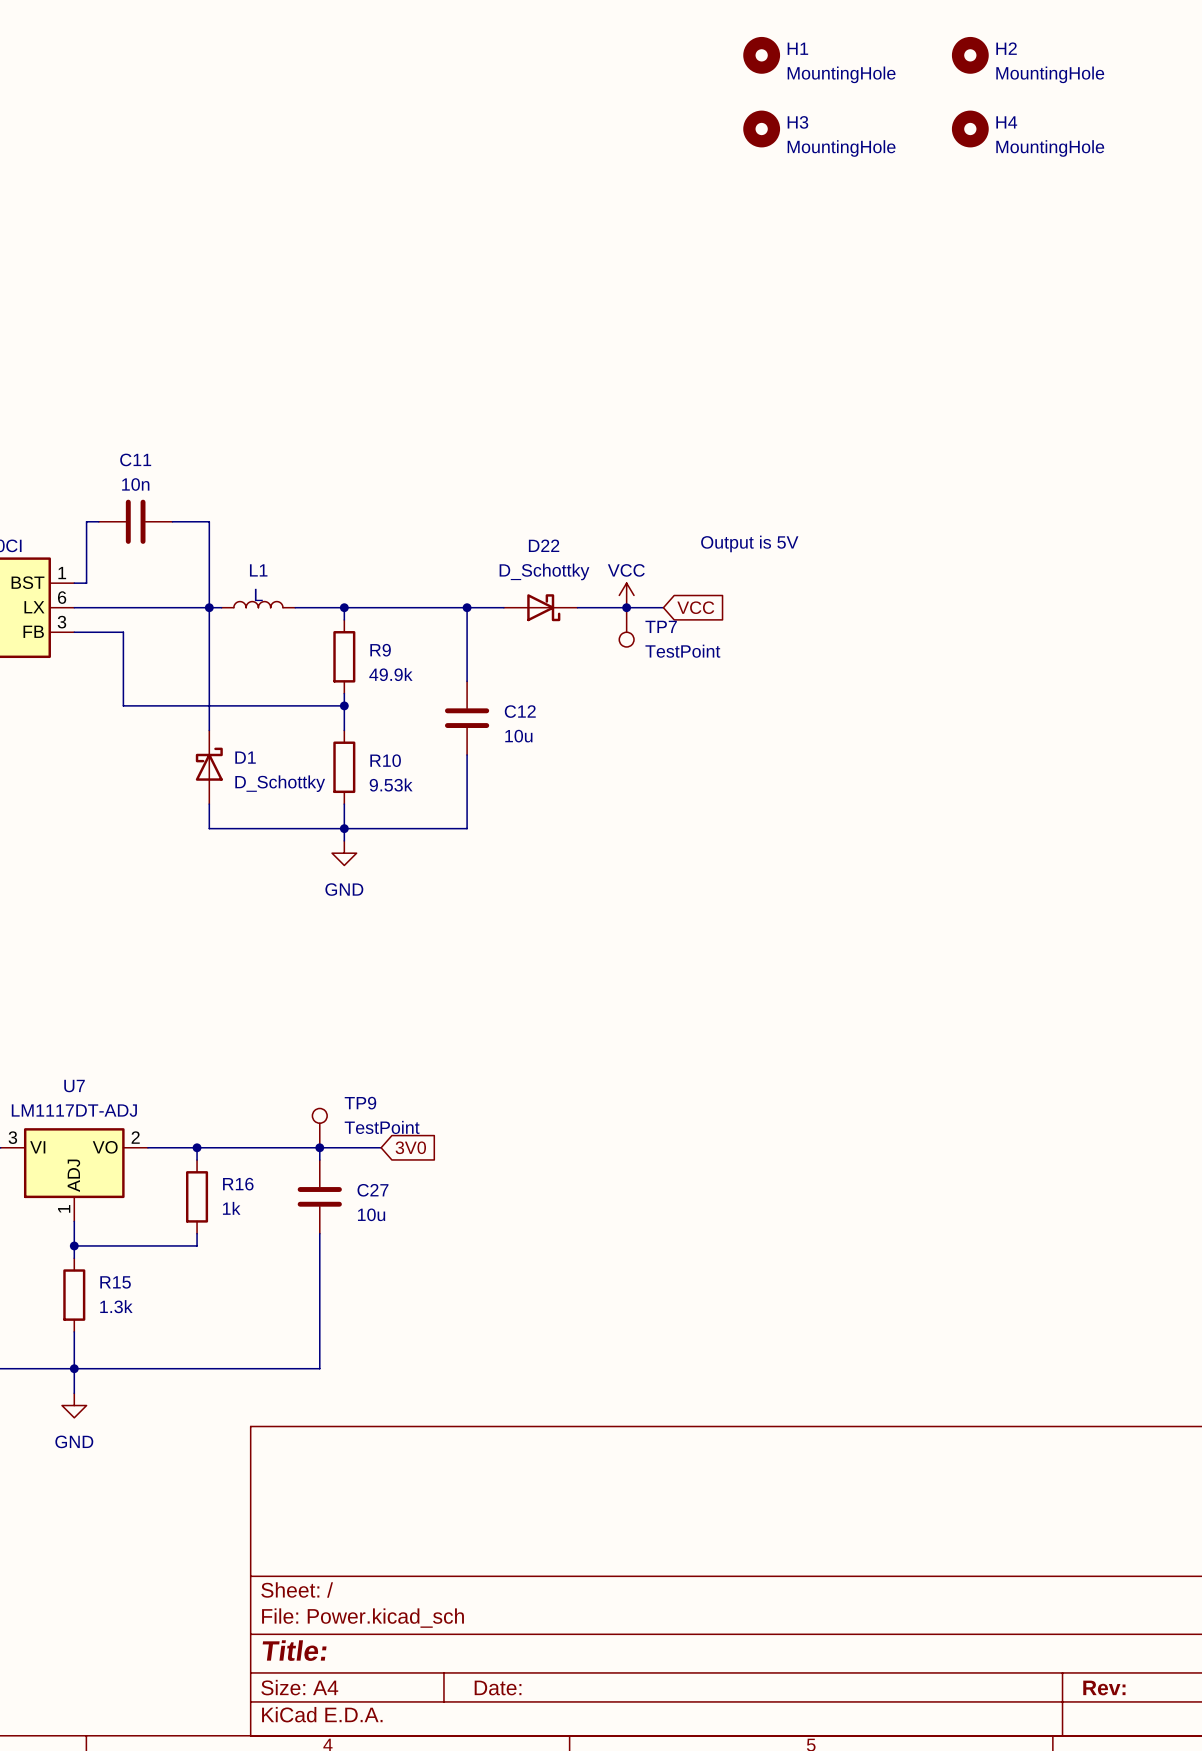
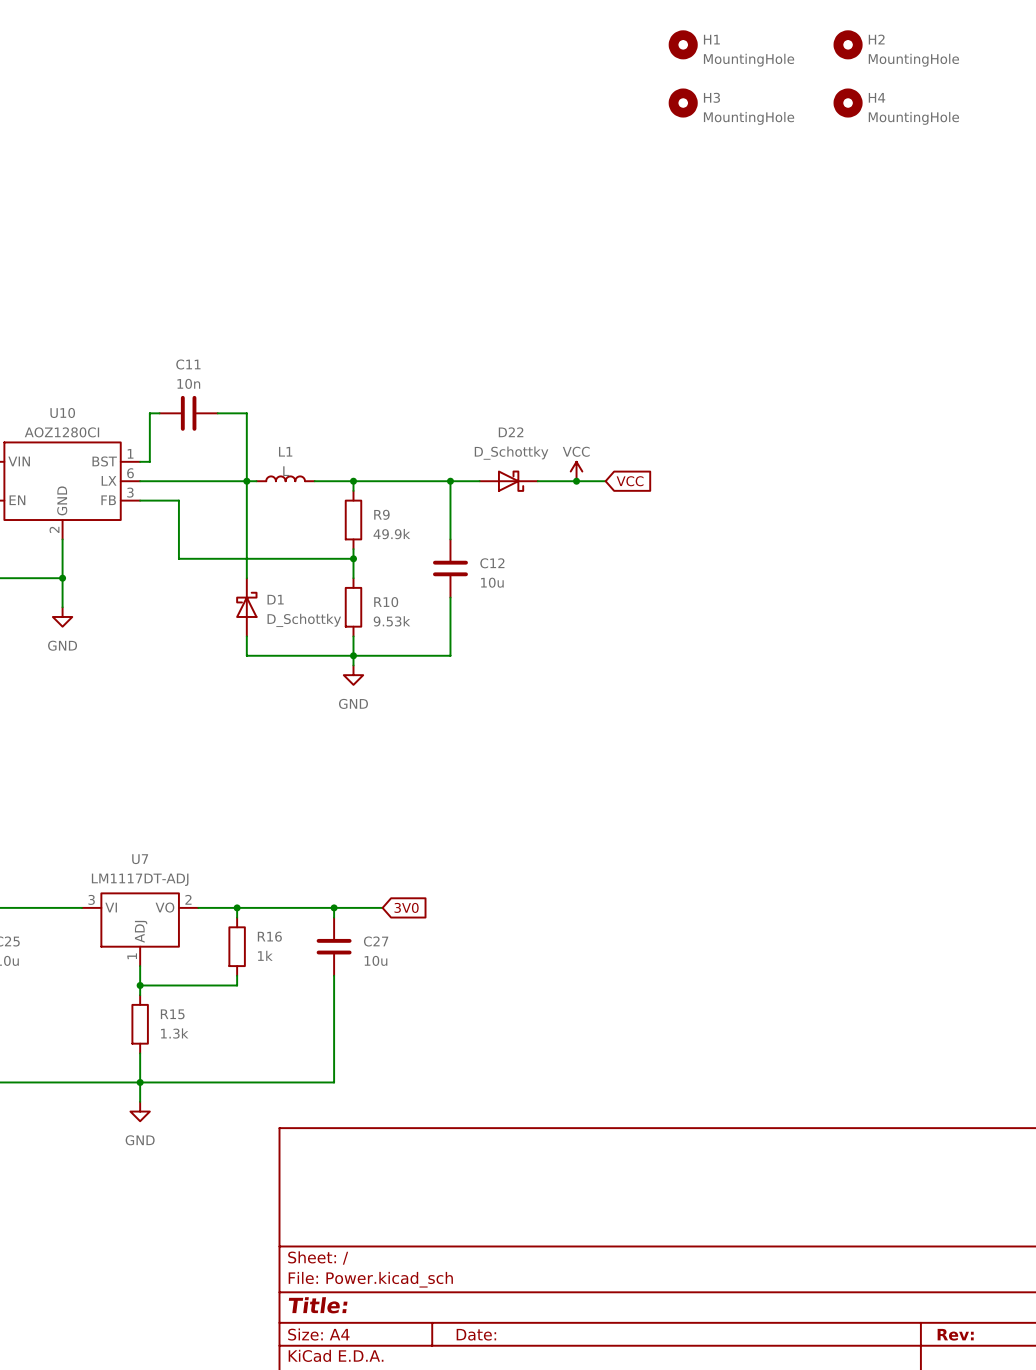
text: Output is 5V (749, 543) -> none
TP7: TestPoint (626, 627) -> none
TP9: TestPoint (319, 1128) -> none

